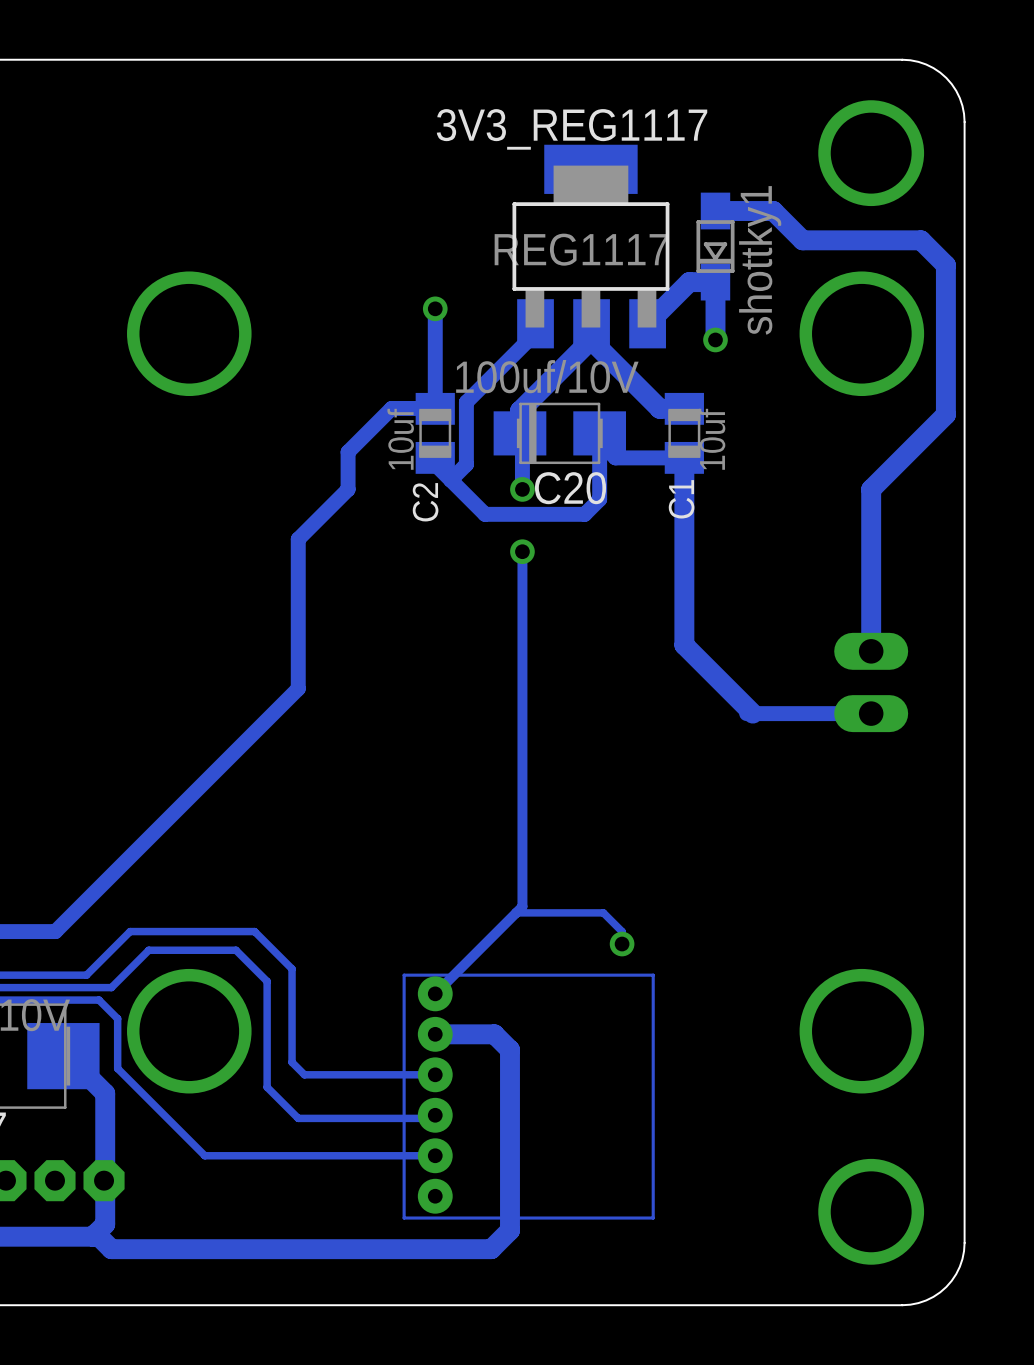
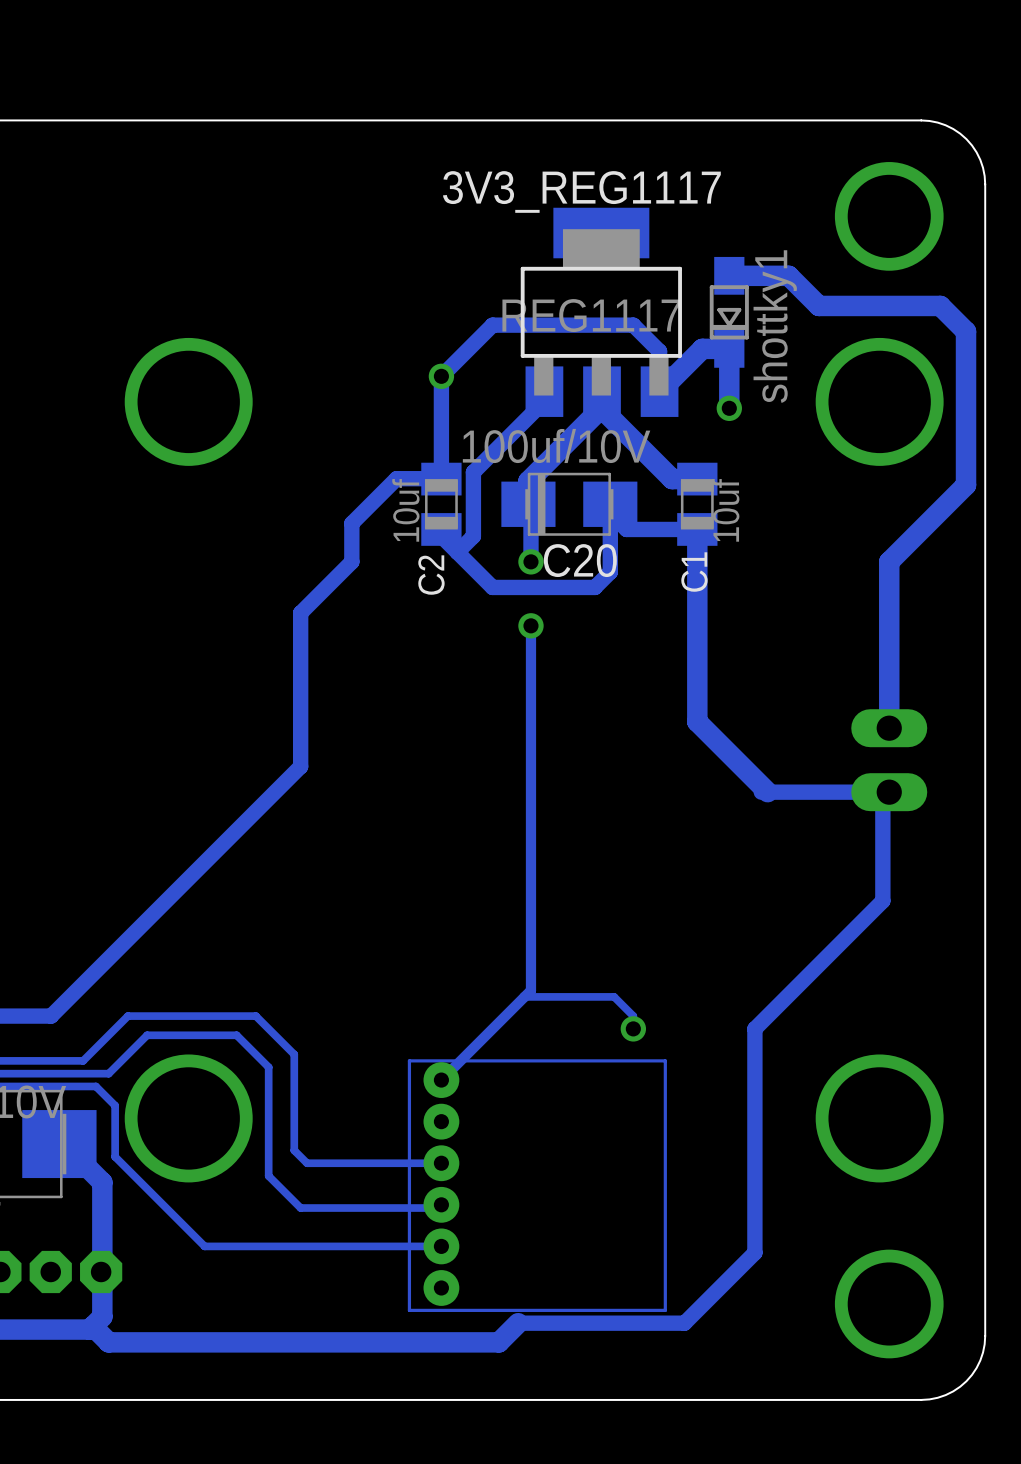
track: none -> (441, 376) (492, 325) (633, 325) (659, 351) (659, 391)
track: (435, 1034) (494, 1034) (509, 1049) (509, 1230) -> (889, 792) (882, 798) (882, 900) (754, 1028) (754, 1252) (684, 1323) (518, 1323)

